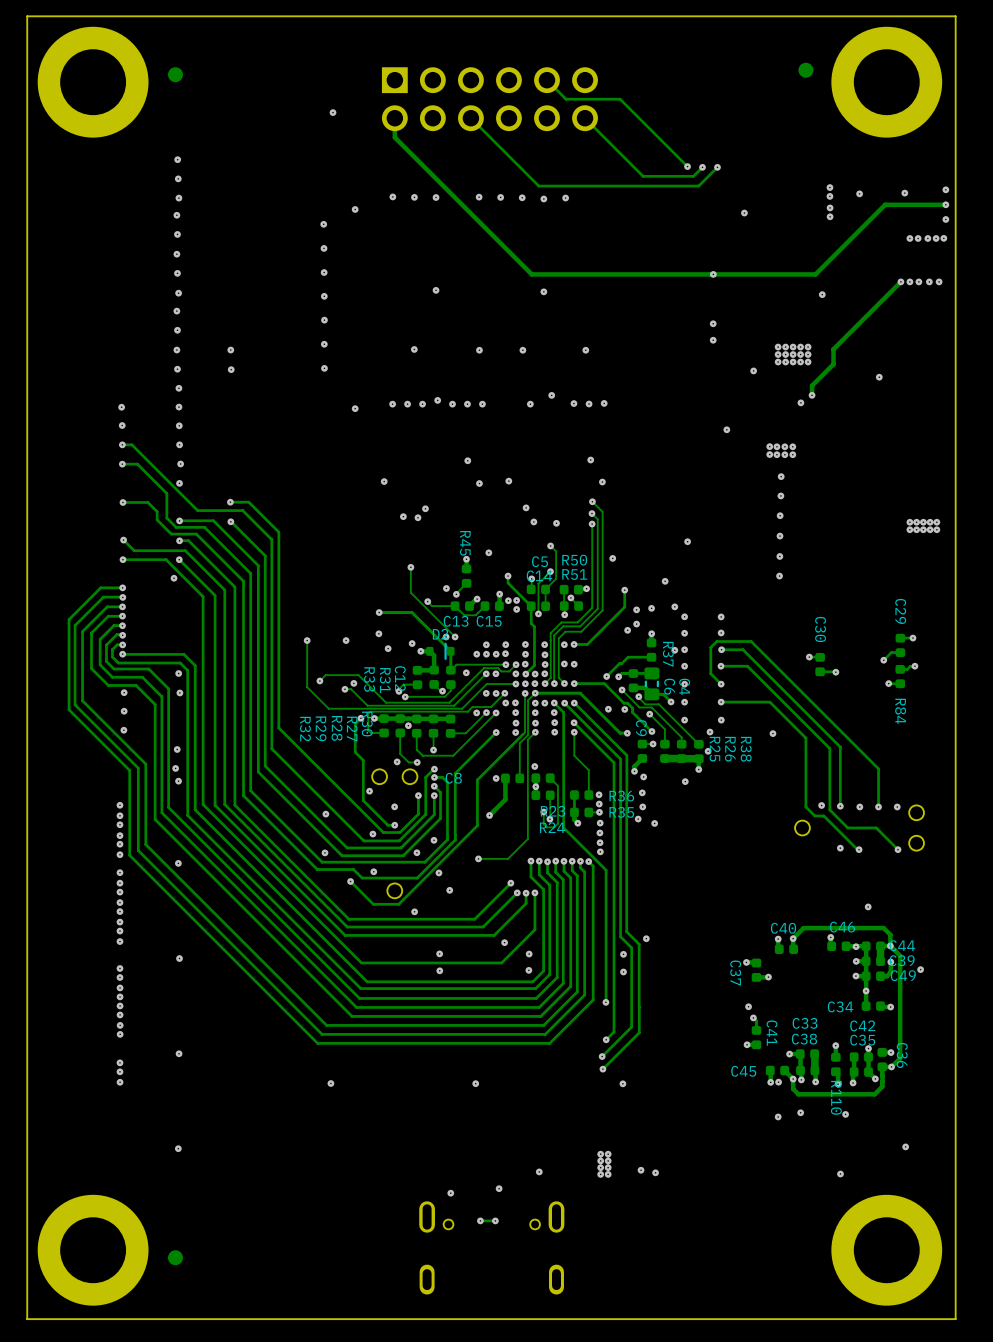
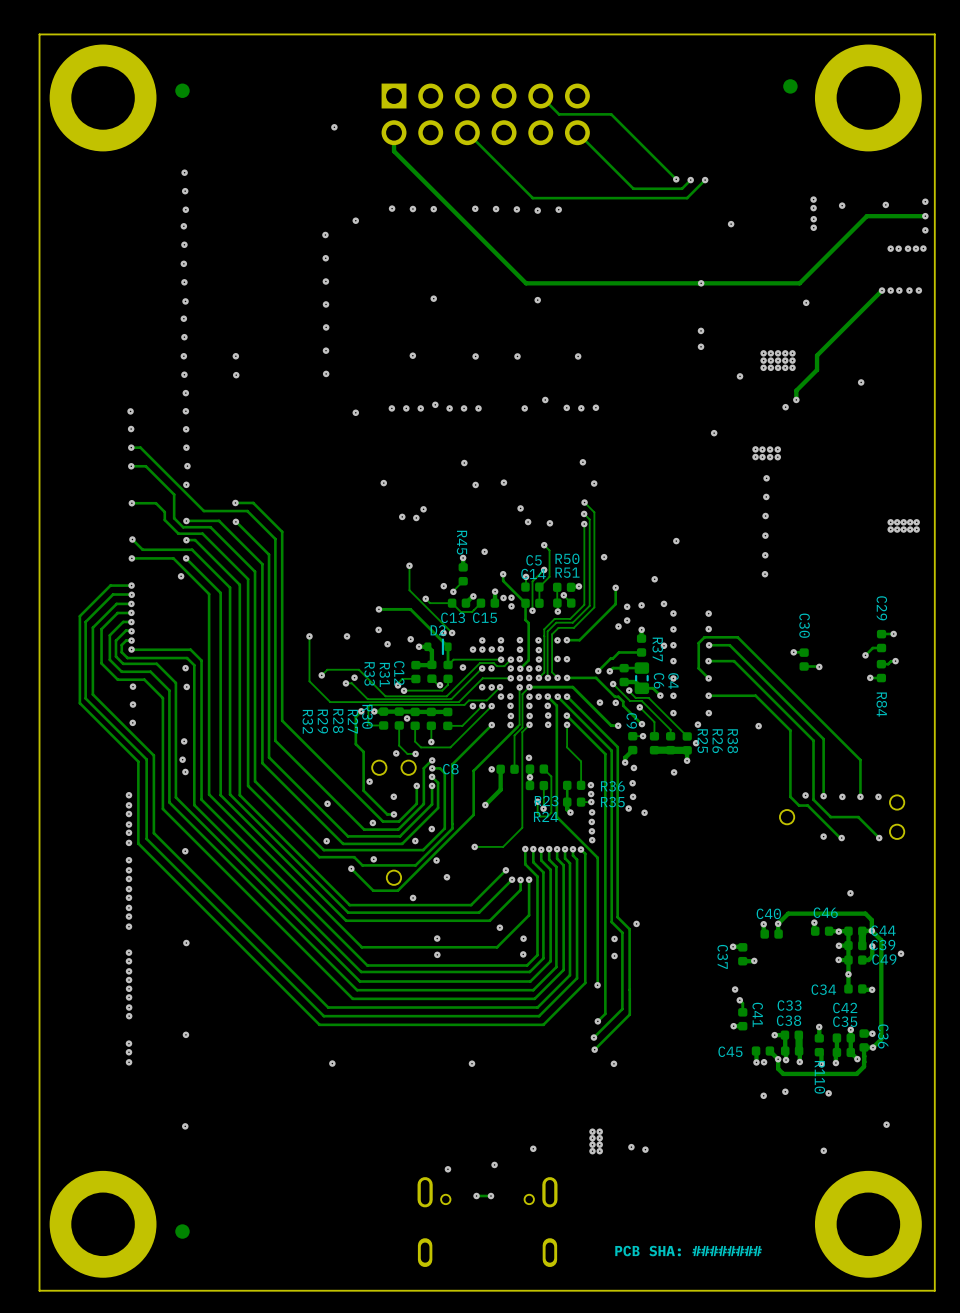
text: none -> PCB SHA: ######## (688, 1251)

